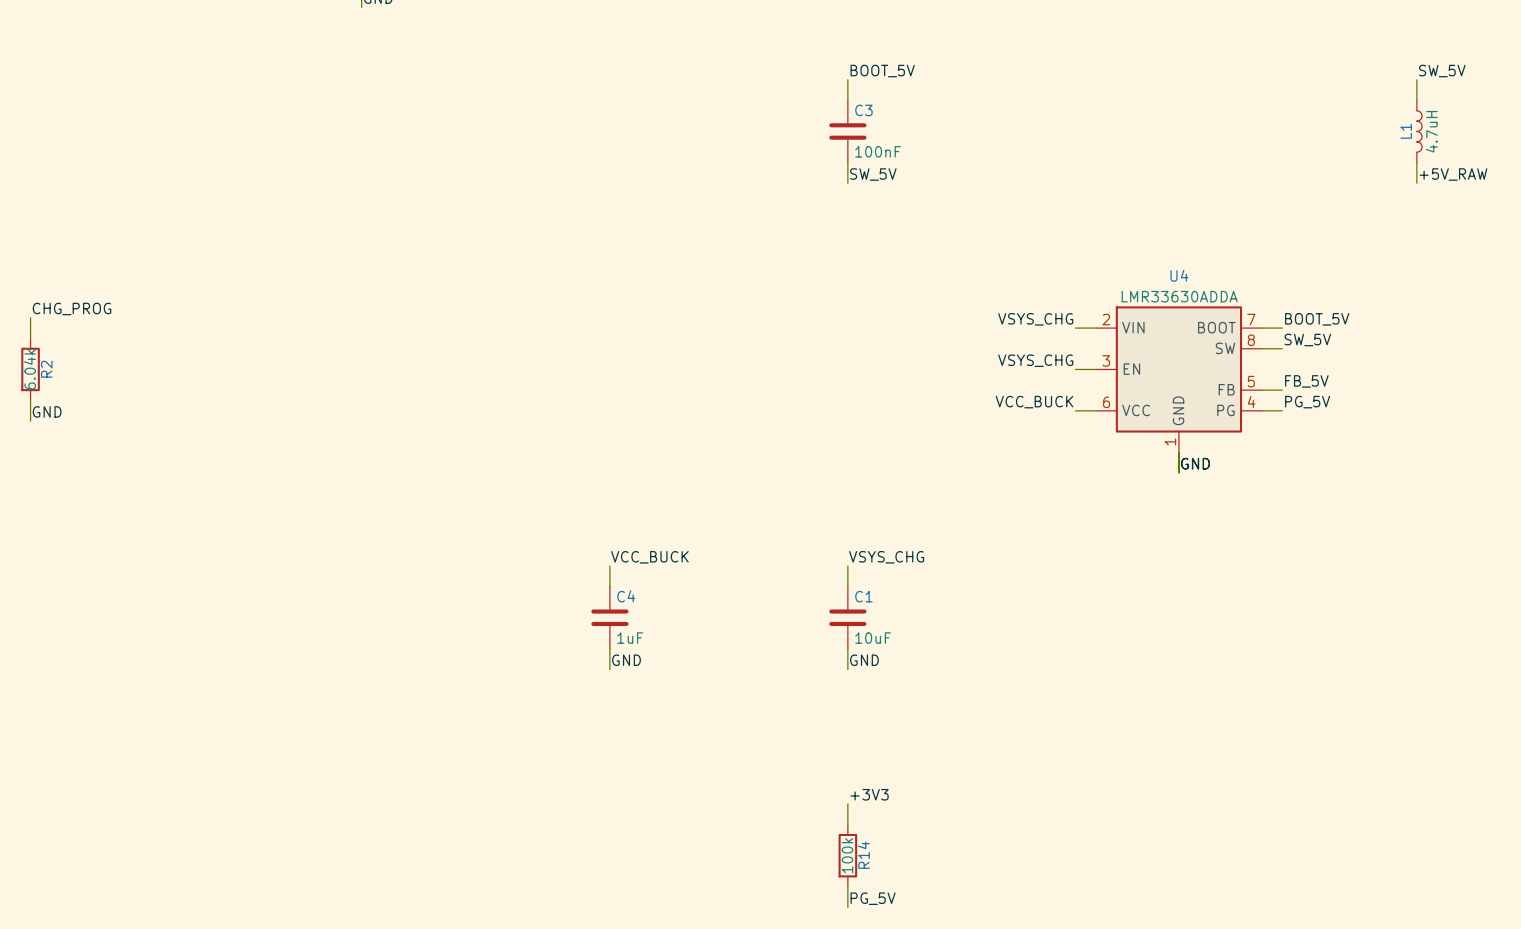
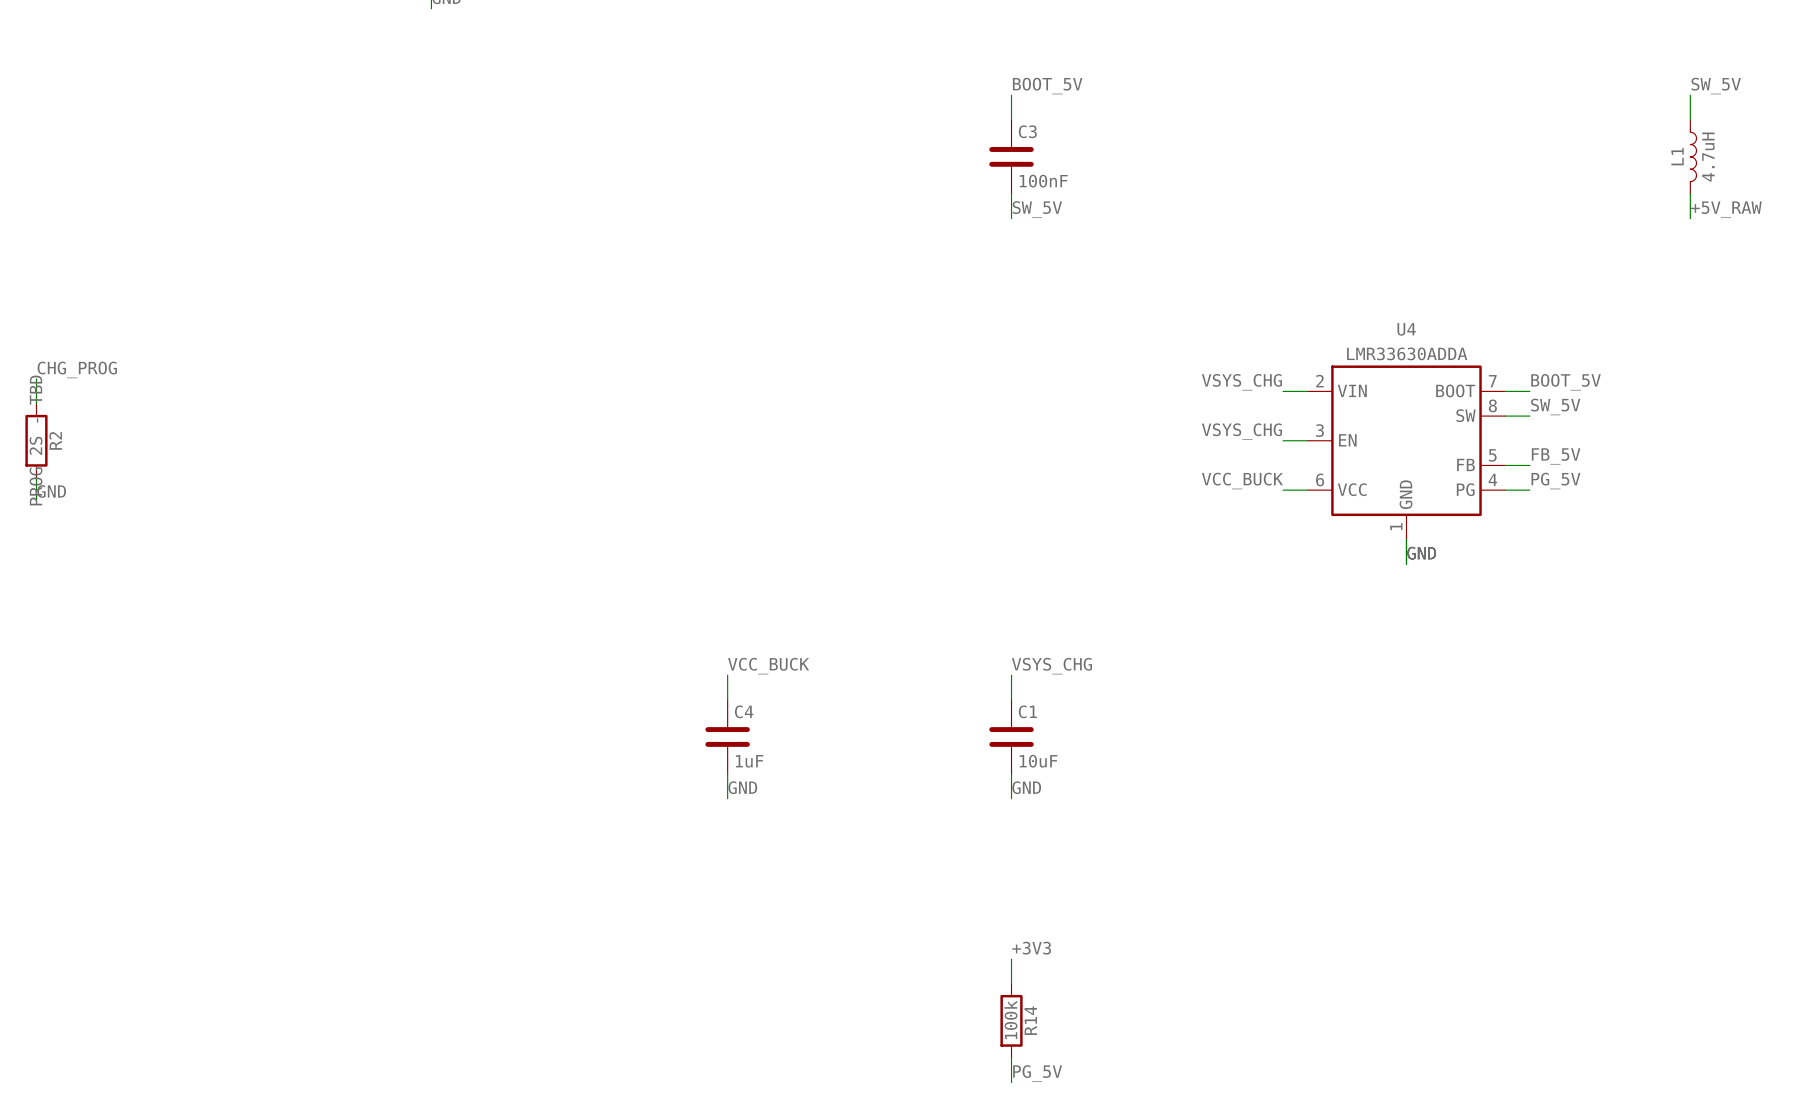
R2 value: 6.04k (29, 369) -> PROG 2S - TBD (36, 440)

